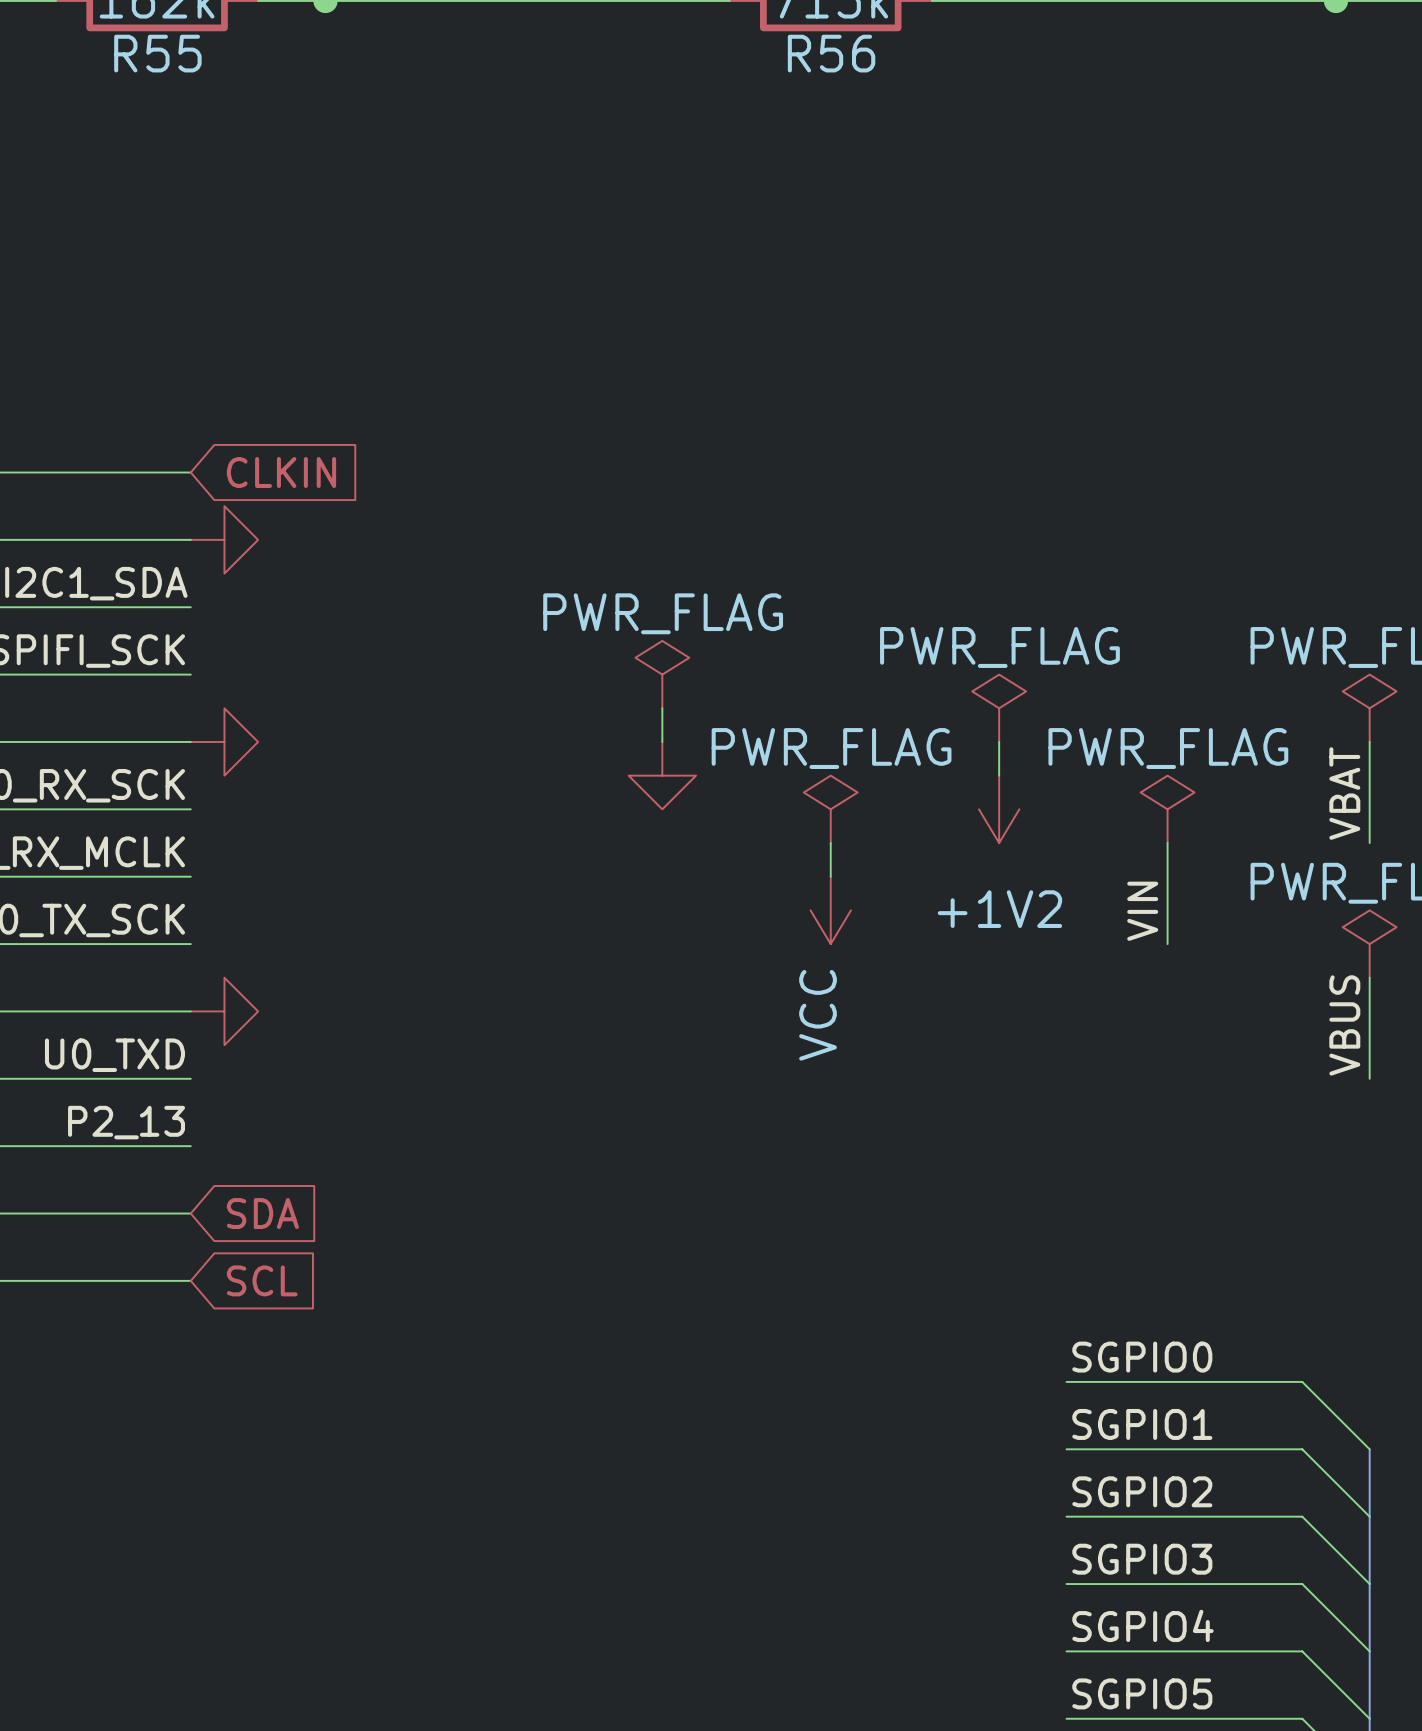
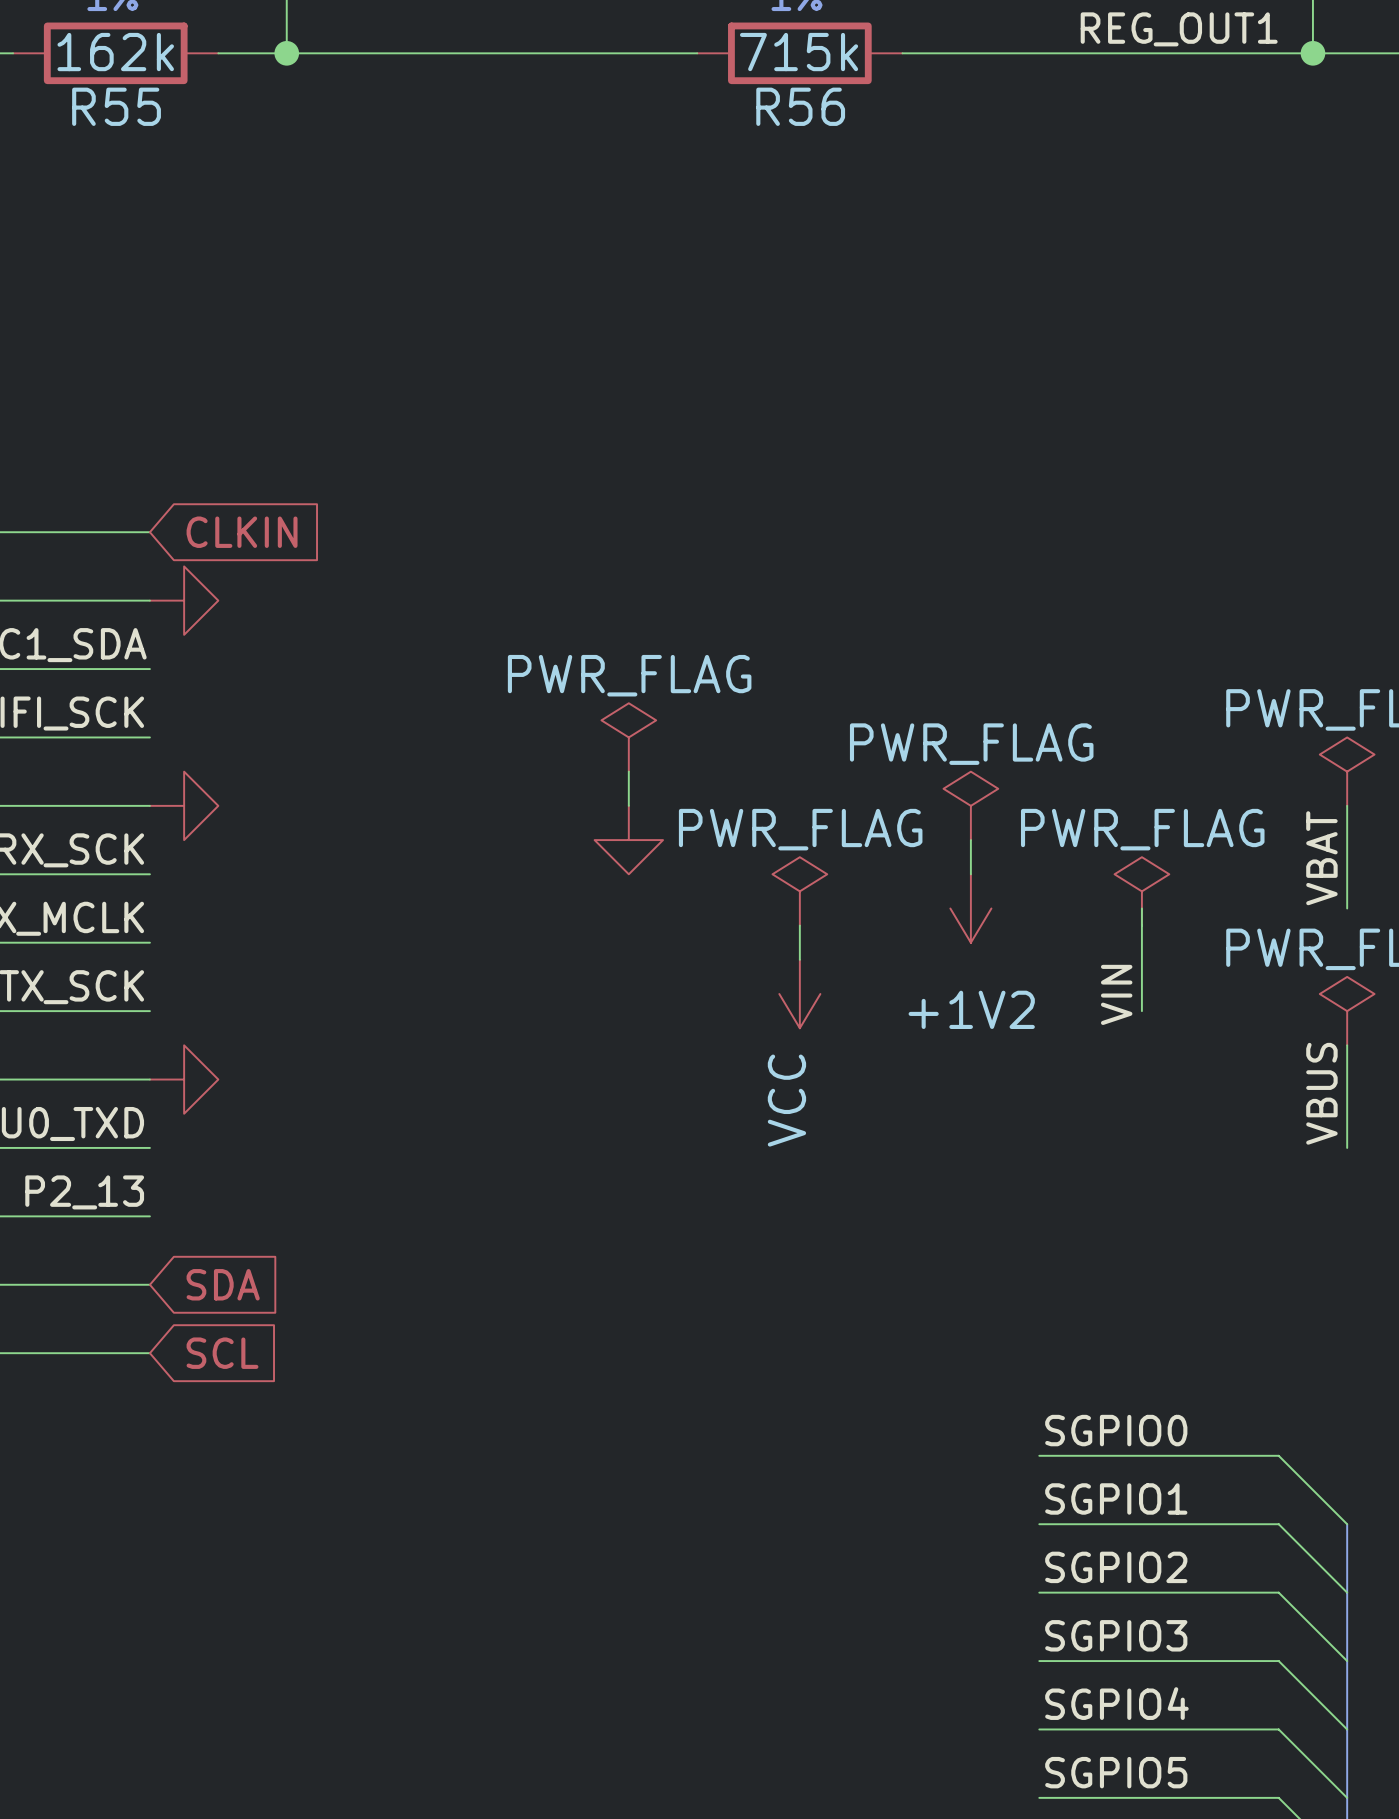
power symbol position: PWR_FLAG (999, 708) -> PWR_FLAG (970, 805)
power symbol position: PWR_FLAG (830, 809) -> PWR_FLAG (799, 891)
power symbol position: +1V2 (999, 809) -> +1V2 (970, 908)
power symbol position: PWR_FLAG (1167, 809) -> PWR_FLAG (1141, 891)
power symbol position: VCC (830, 910) -> VCC (799, 994)
label position: VIN (1142, 911) -> VIN (1116, 994)

